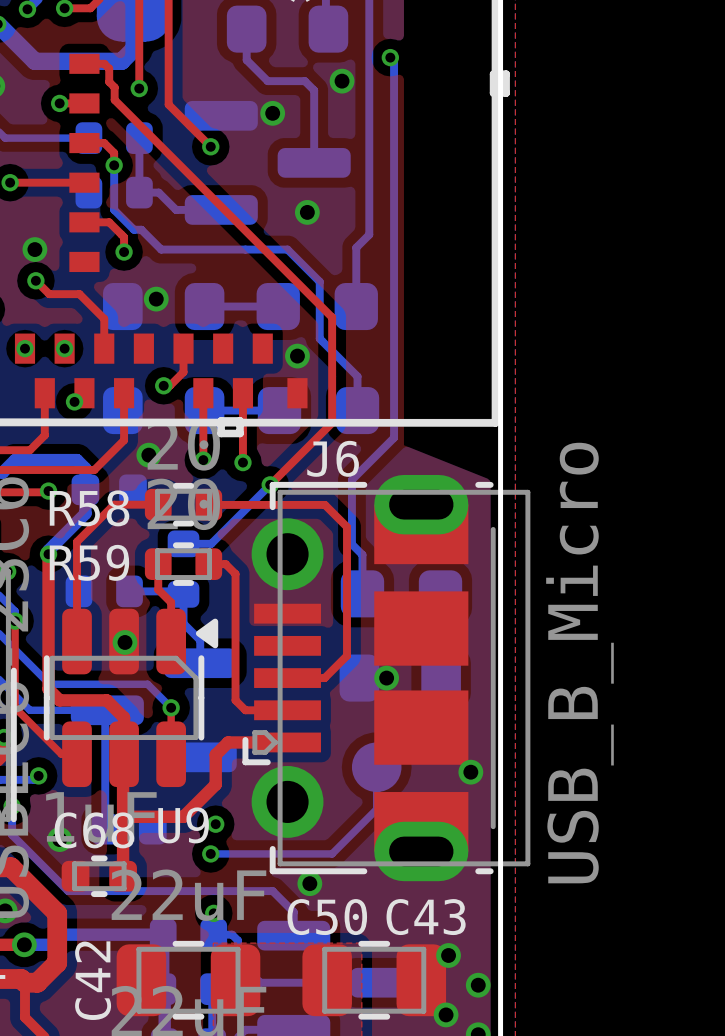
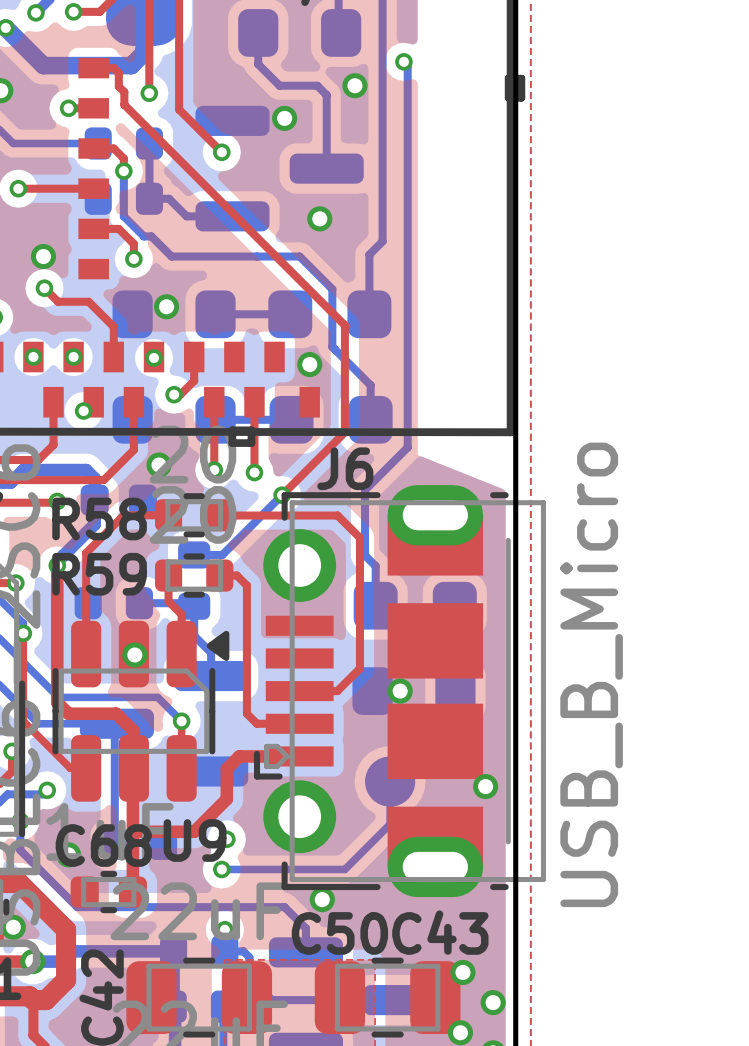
via: none -> (153, 358)

